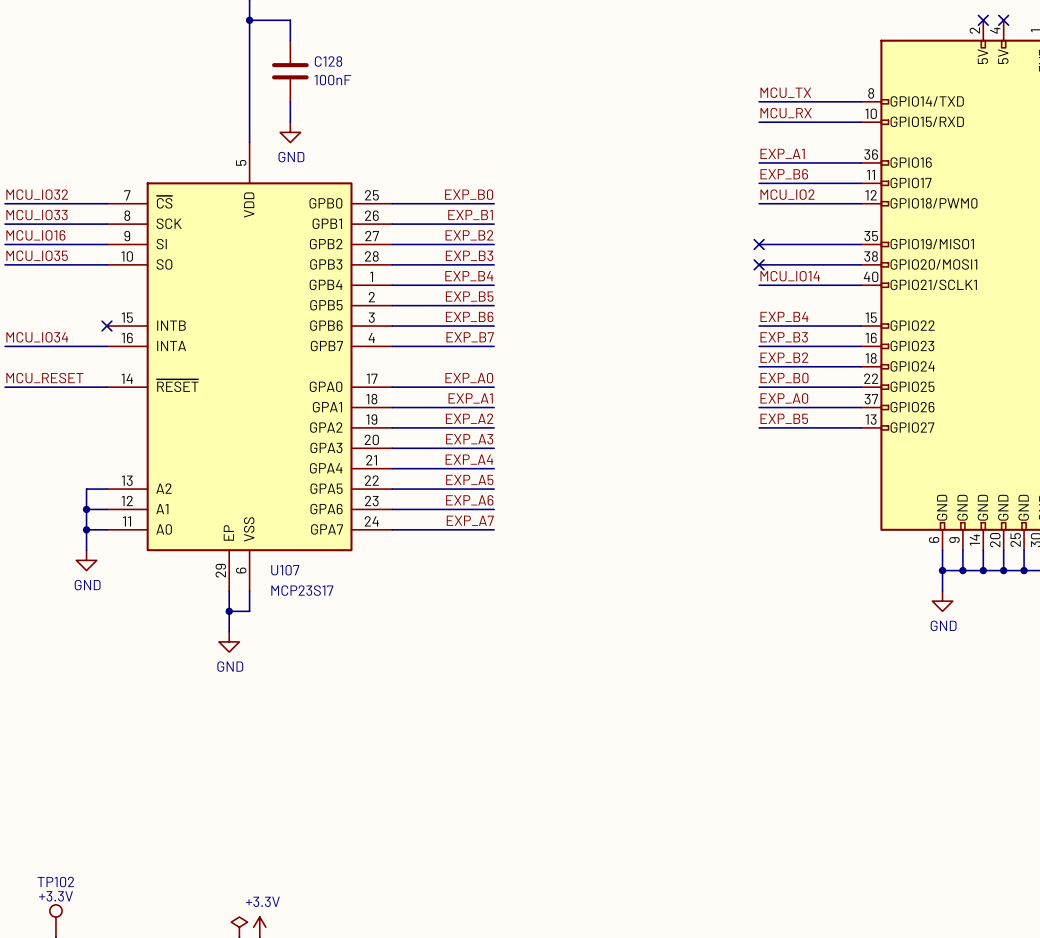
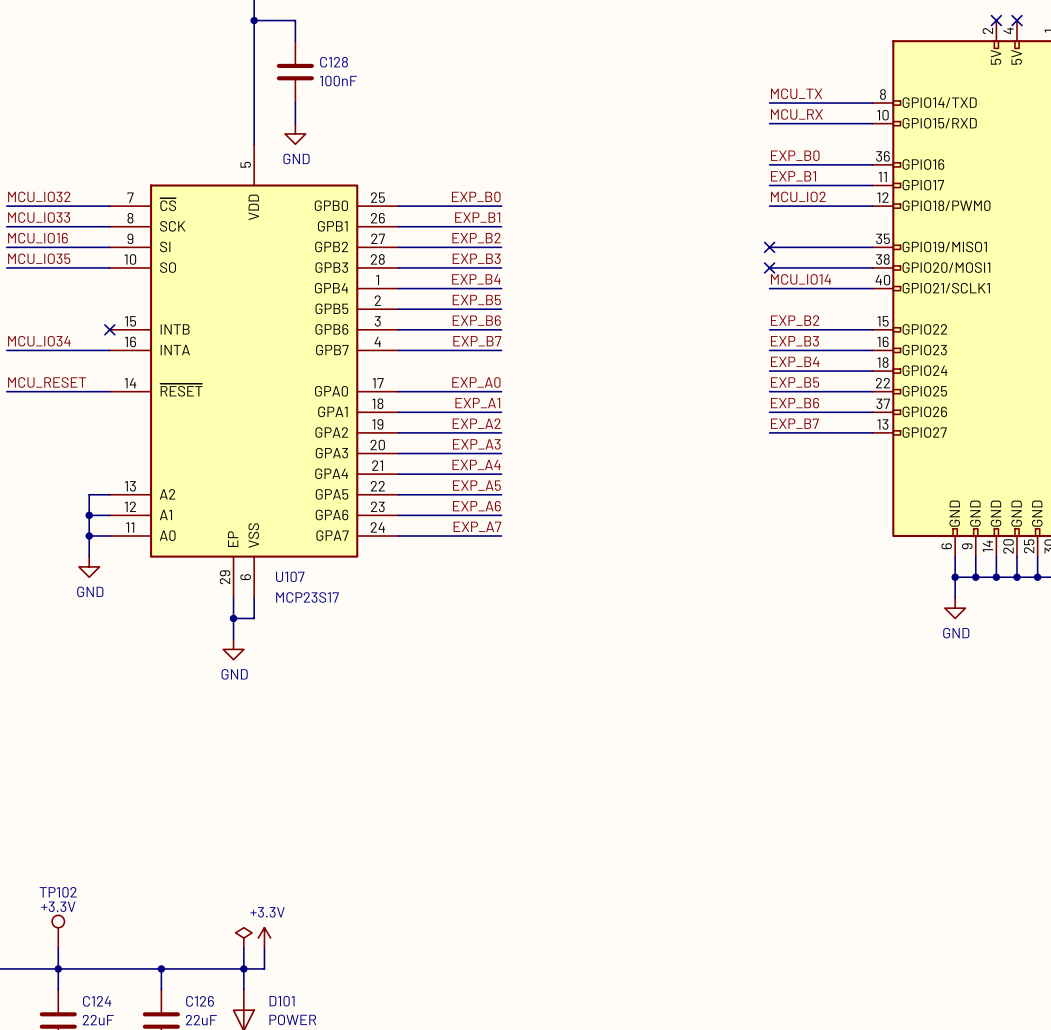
label: EXP_A1 (782, 153) -> EXP_B0 (795, 155)
label: EXP_B6 (784, 174) -> EXP_B1 (793, 176)
label: EXP_B4 (784, 316) -> EXP_B2 (795, 320)
label: EXP_B2 (784, 357) -> EXP_B4 (795, 361)
label: EXP_B0 (784, 378) -> EXP_B5 (795, 382)
label: EXP_A0 (784, 398) -> EXP_B6 (795, 403)
label: EXP_B5 (784, 418) -> EXP_B7 (794, 423)

